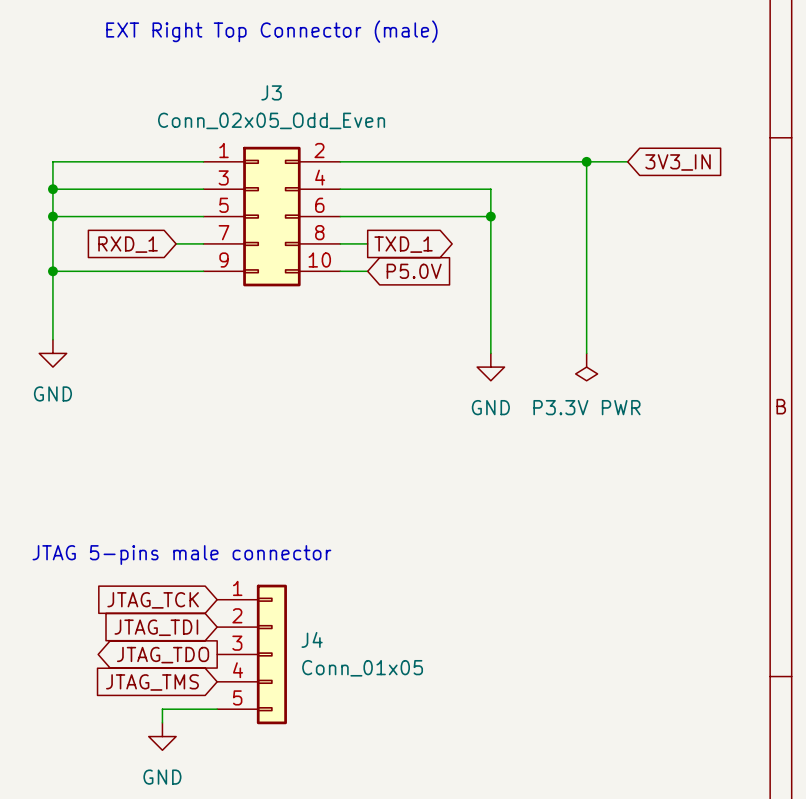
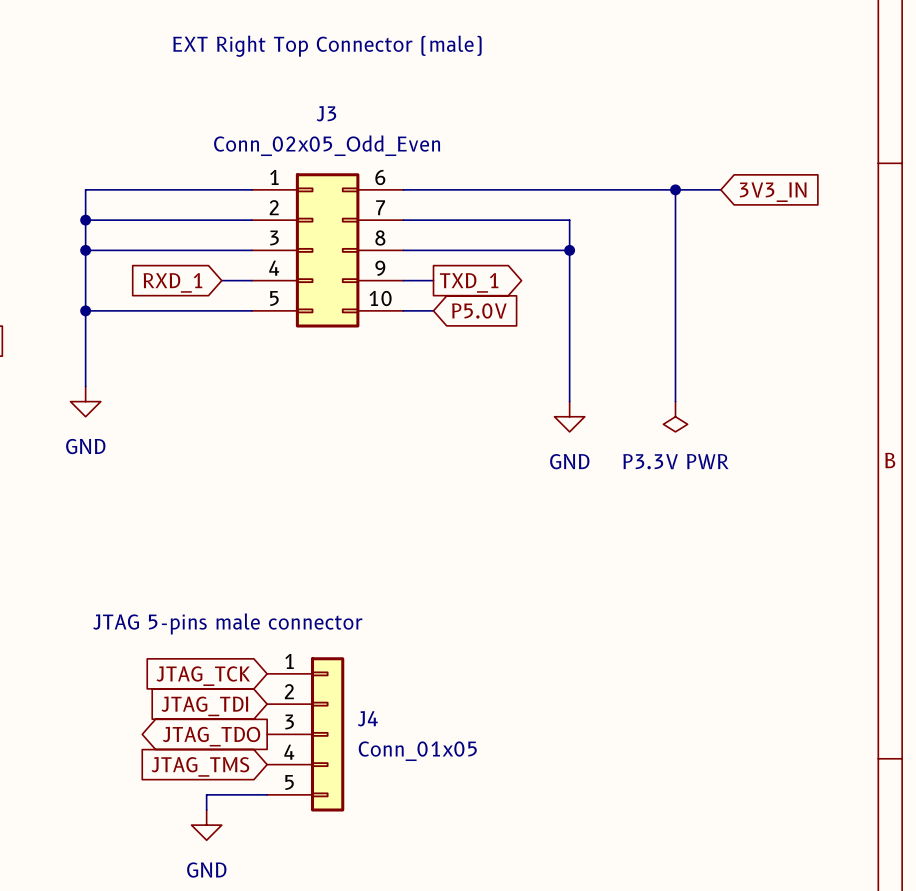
J3 pin number: 2 (319, 150) -> 6 (380, 177)
J3 pin number: 3 (223, 177) -> 2 (274, 207)
J3 pin number: 4 (320, 177) -> 7 (380, 207)
J3 pin number: 5 (224, 205) -> 3 (274, 238)
J3 pin number: 6 (319, 205) -> 8 (380, 238)
J3 pin number: 7 (224, 232) -> 4 (274, 268)
J3 pin number: 8 (319, 232) -> 9 (380, 268)
J3 pin number: 9 (224, 260) -> 5 (274, 298)

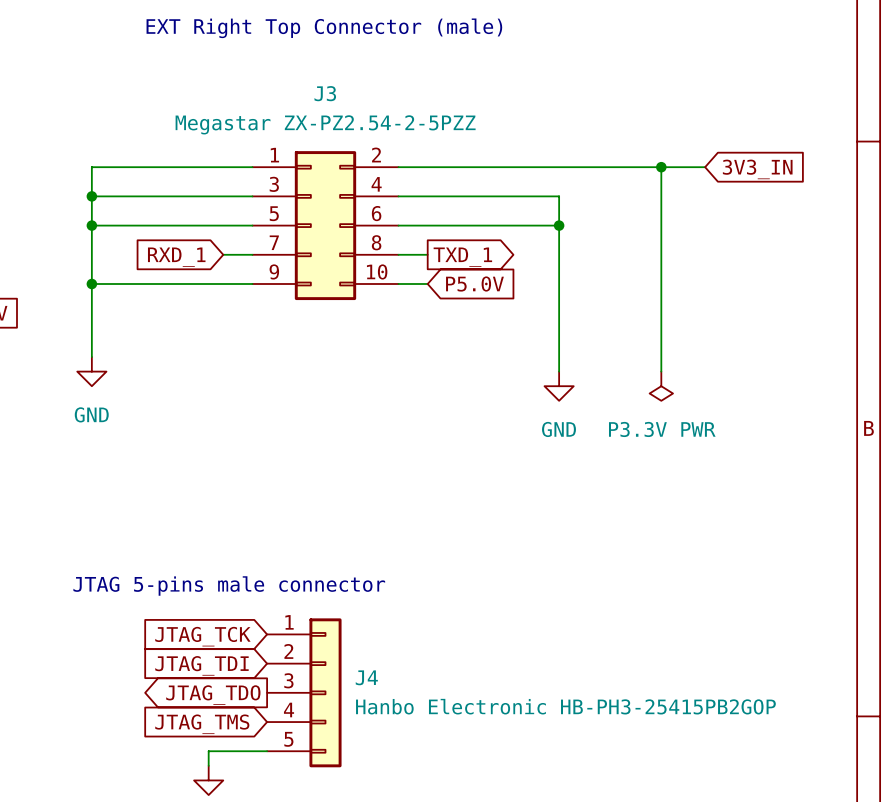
J3 value: Conn_02x05_Odd_Even (327, 145) -> Megastar ZX-PZ2.54-2-5PZZ (325, 124)
J3 pin number: 6 (380, 177) -> 2 (376, 155)
J3 pin number: 2 (274, 207) -> 3 (274, 184)
J3 pin number: 7 (380, 207) -> 4 (376, 184)
J3 pin number: 3 (274, 238) -> 5 (274, 213)
J3 pin number: 8 (380, 238) -> 6 (376, 213)
J3 pin number: 4 (274, 268) -> 7 (274, 242)
J3 pin number: 9 (380, 268) -> 8 (376, 242)
J3 pin number: 5 (274, 298) -> 9 (274, 271)
J4 value: Conn_01x05 (417, 751) -> Hanbo Electronic HB-PH3-25415PB2GOP (565, 706)

